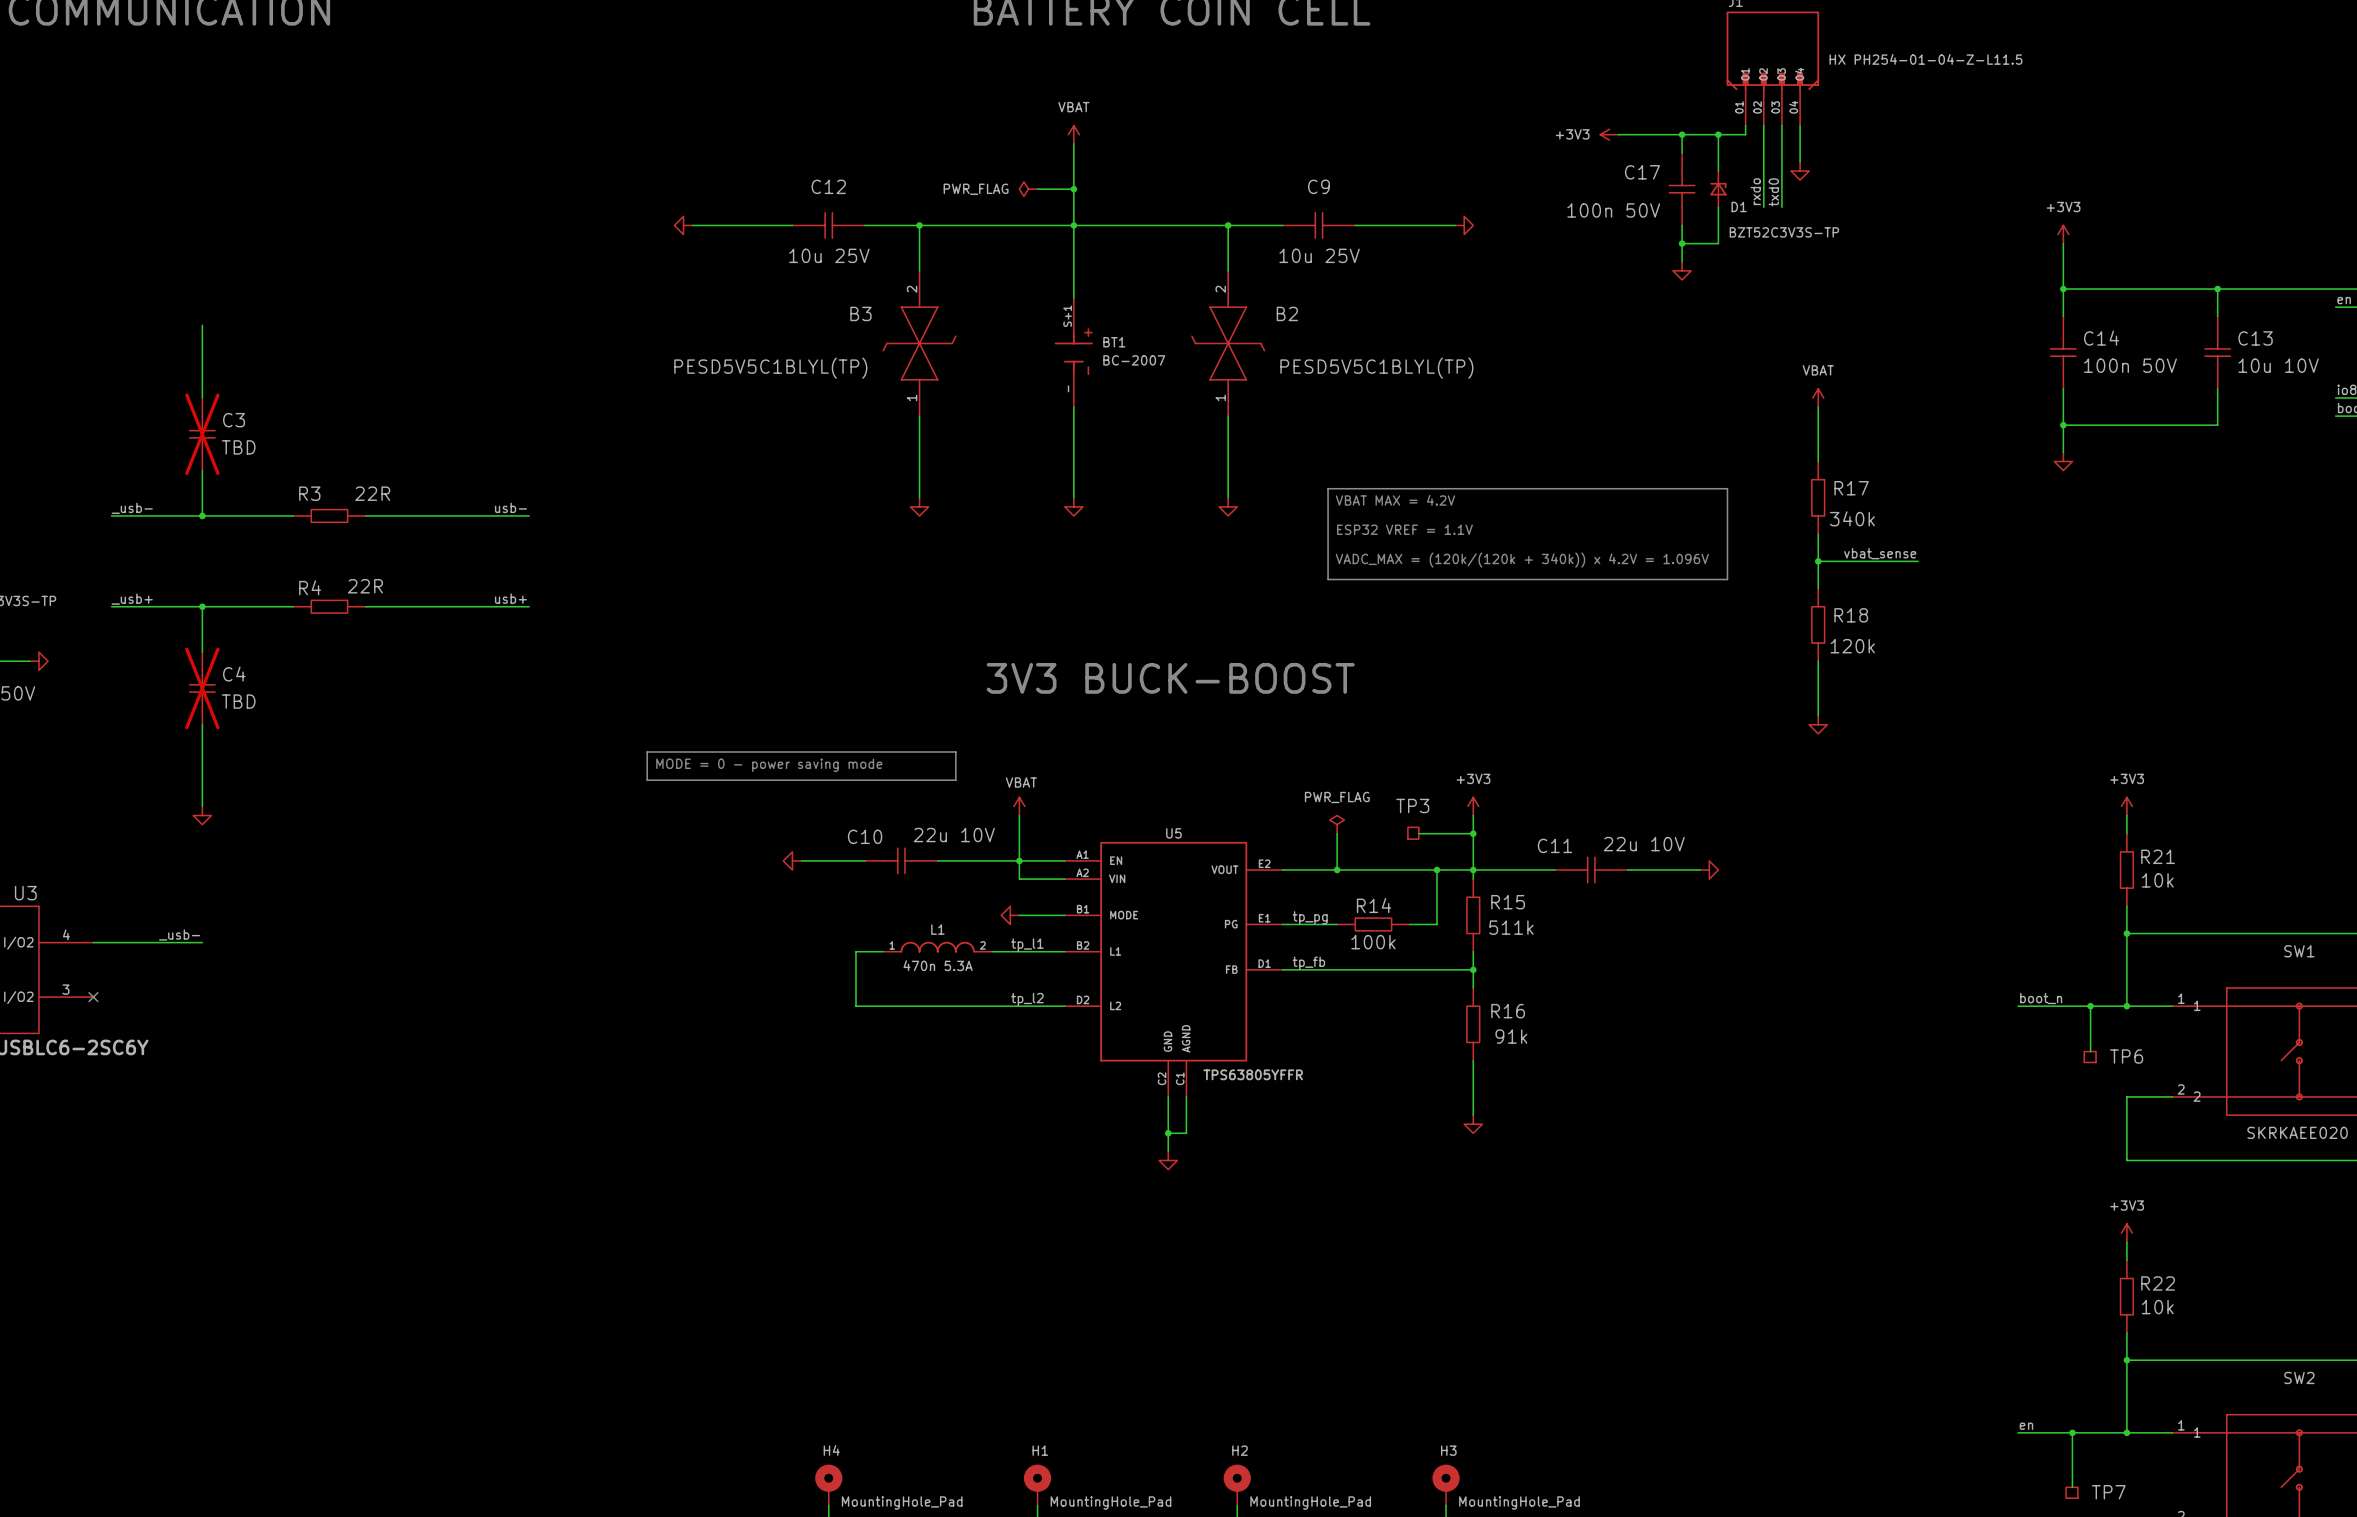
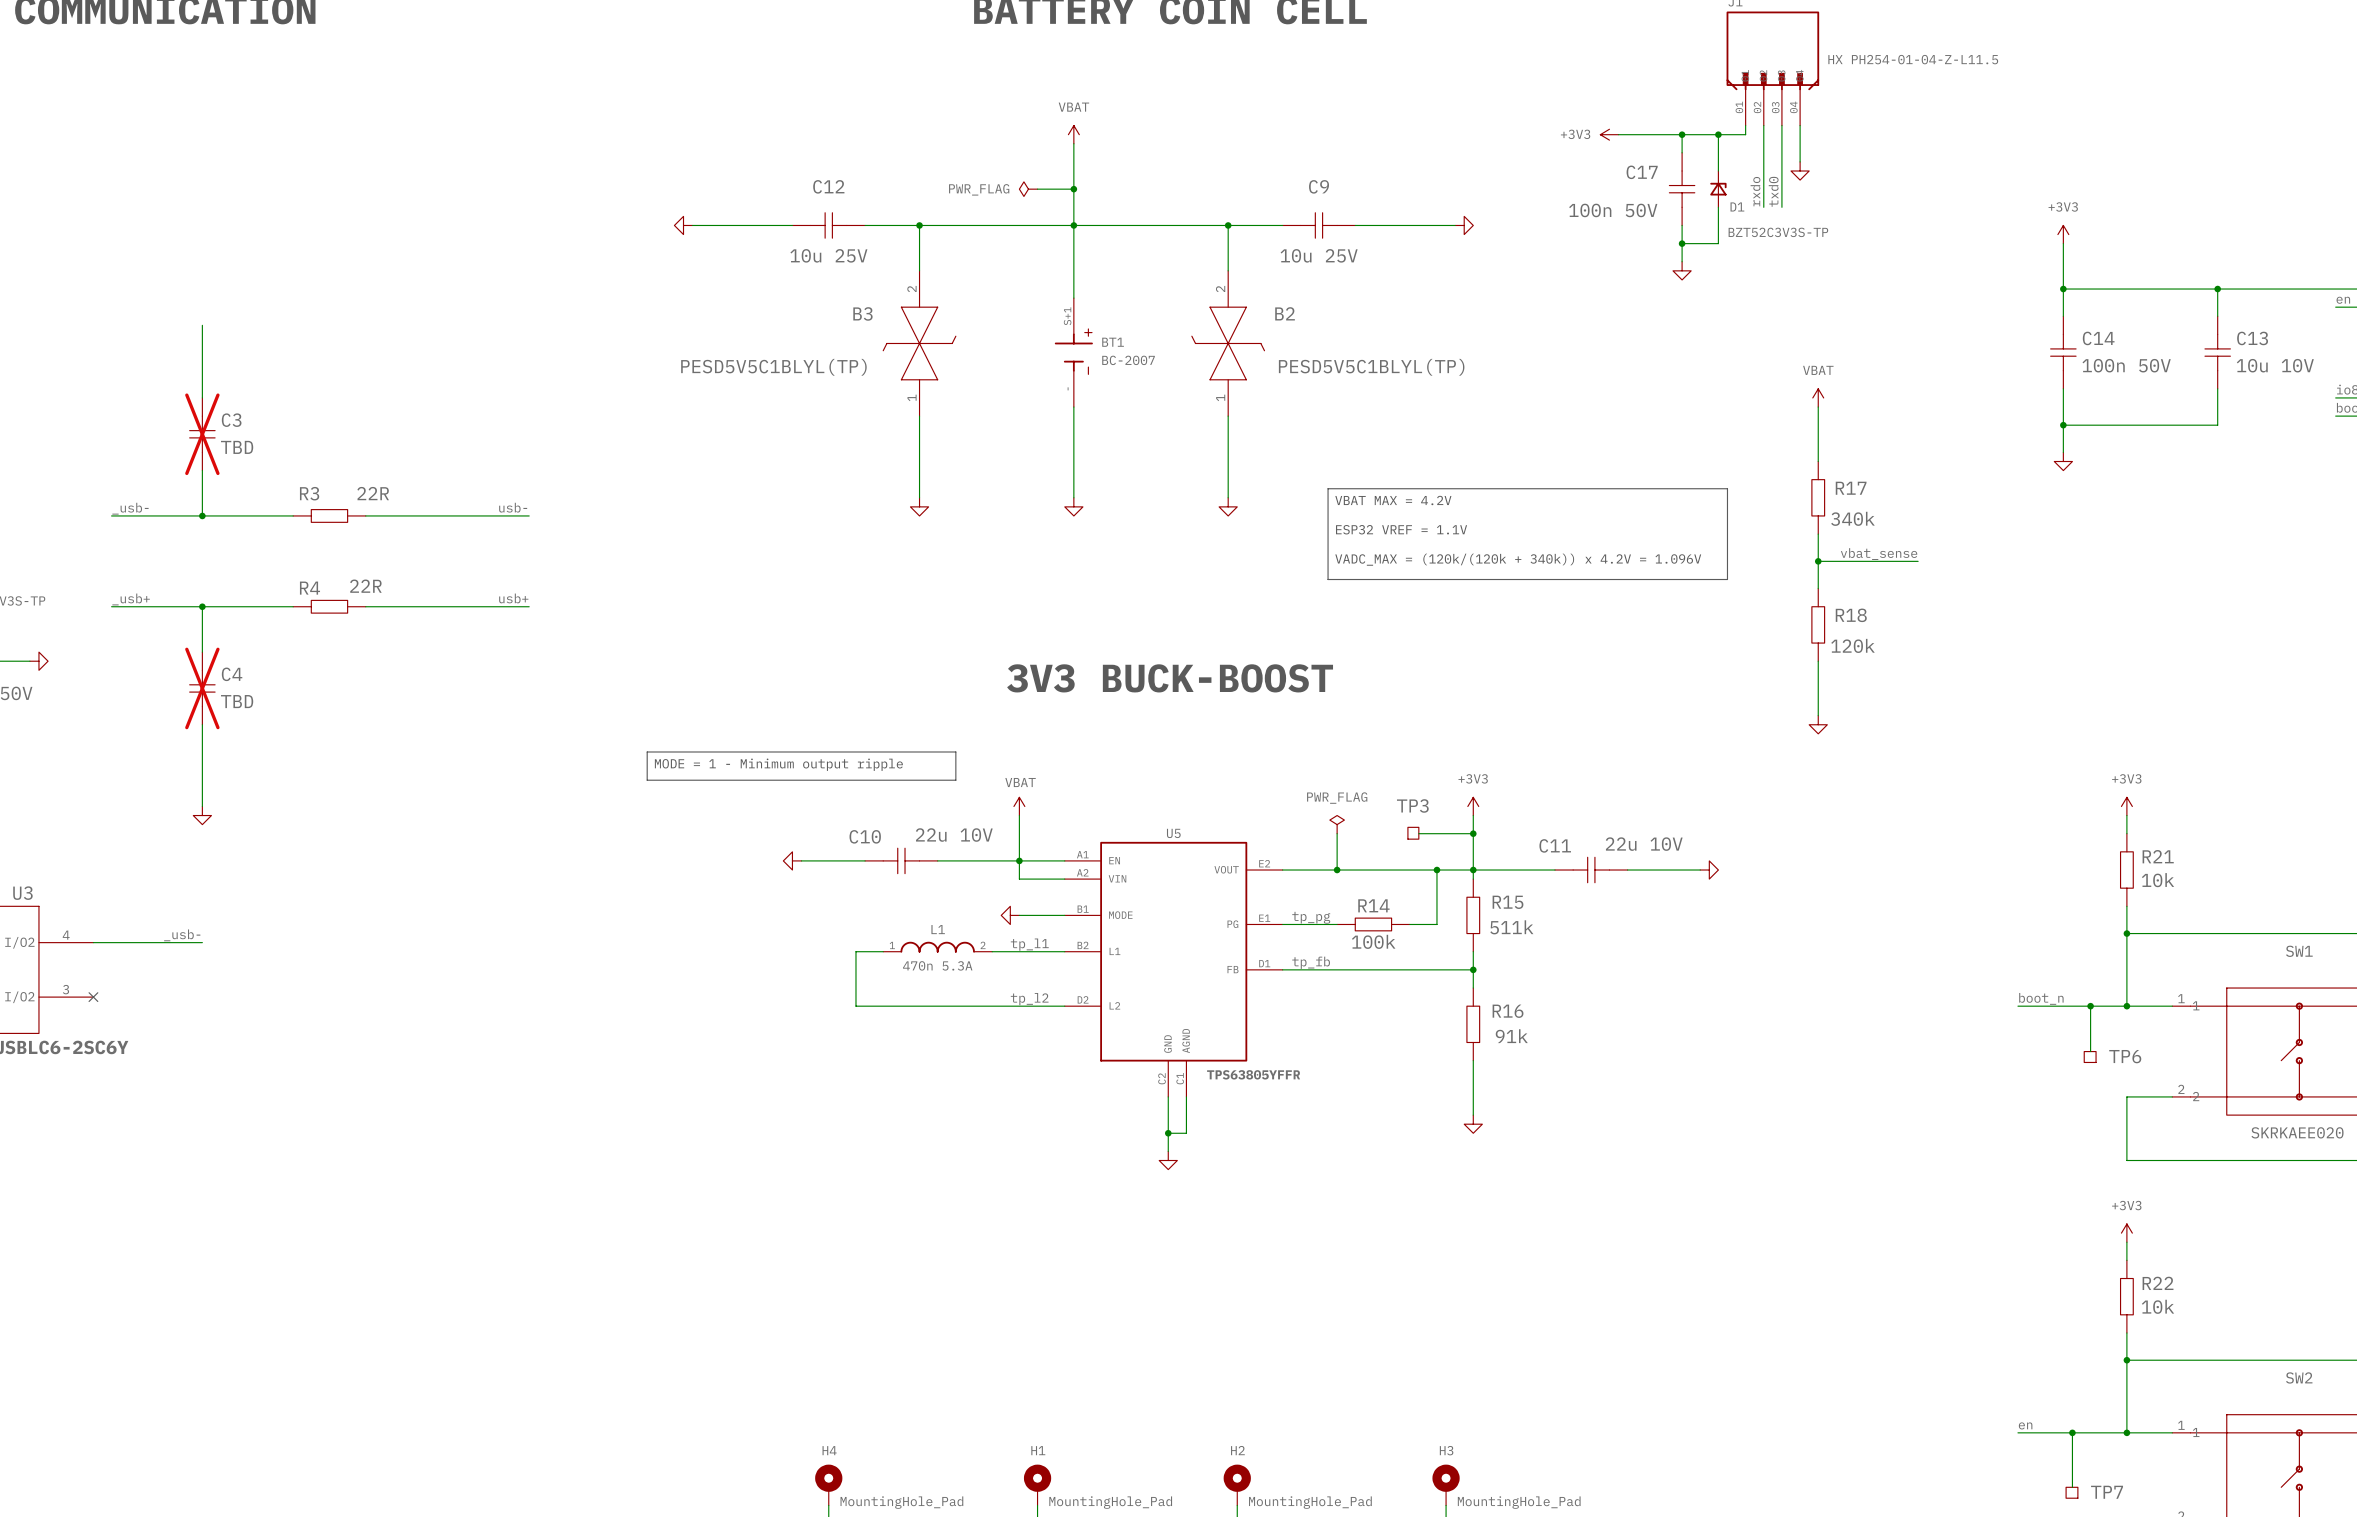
text: MODE = 0 - power saving mode (769, 765) -> MODE = 1 - Minimum output ripple (778, 764)

